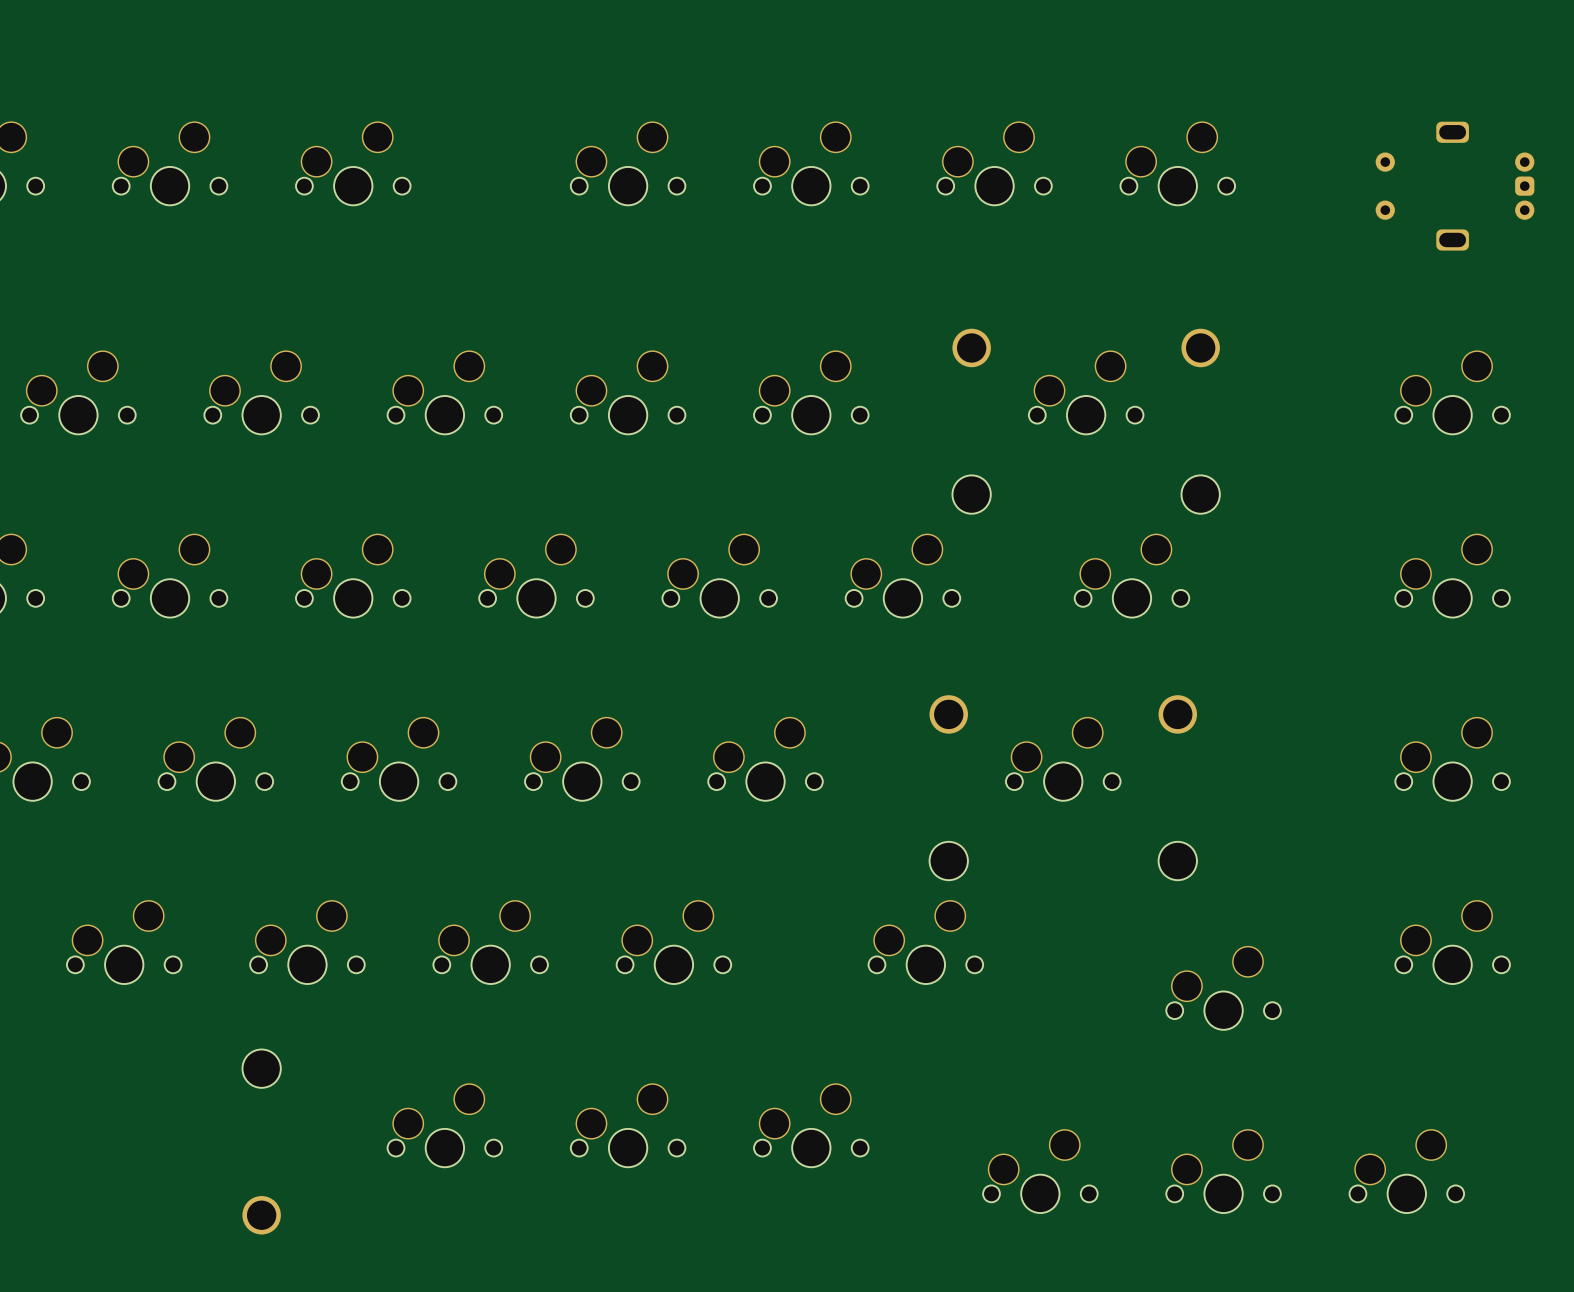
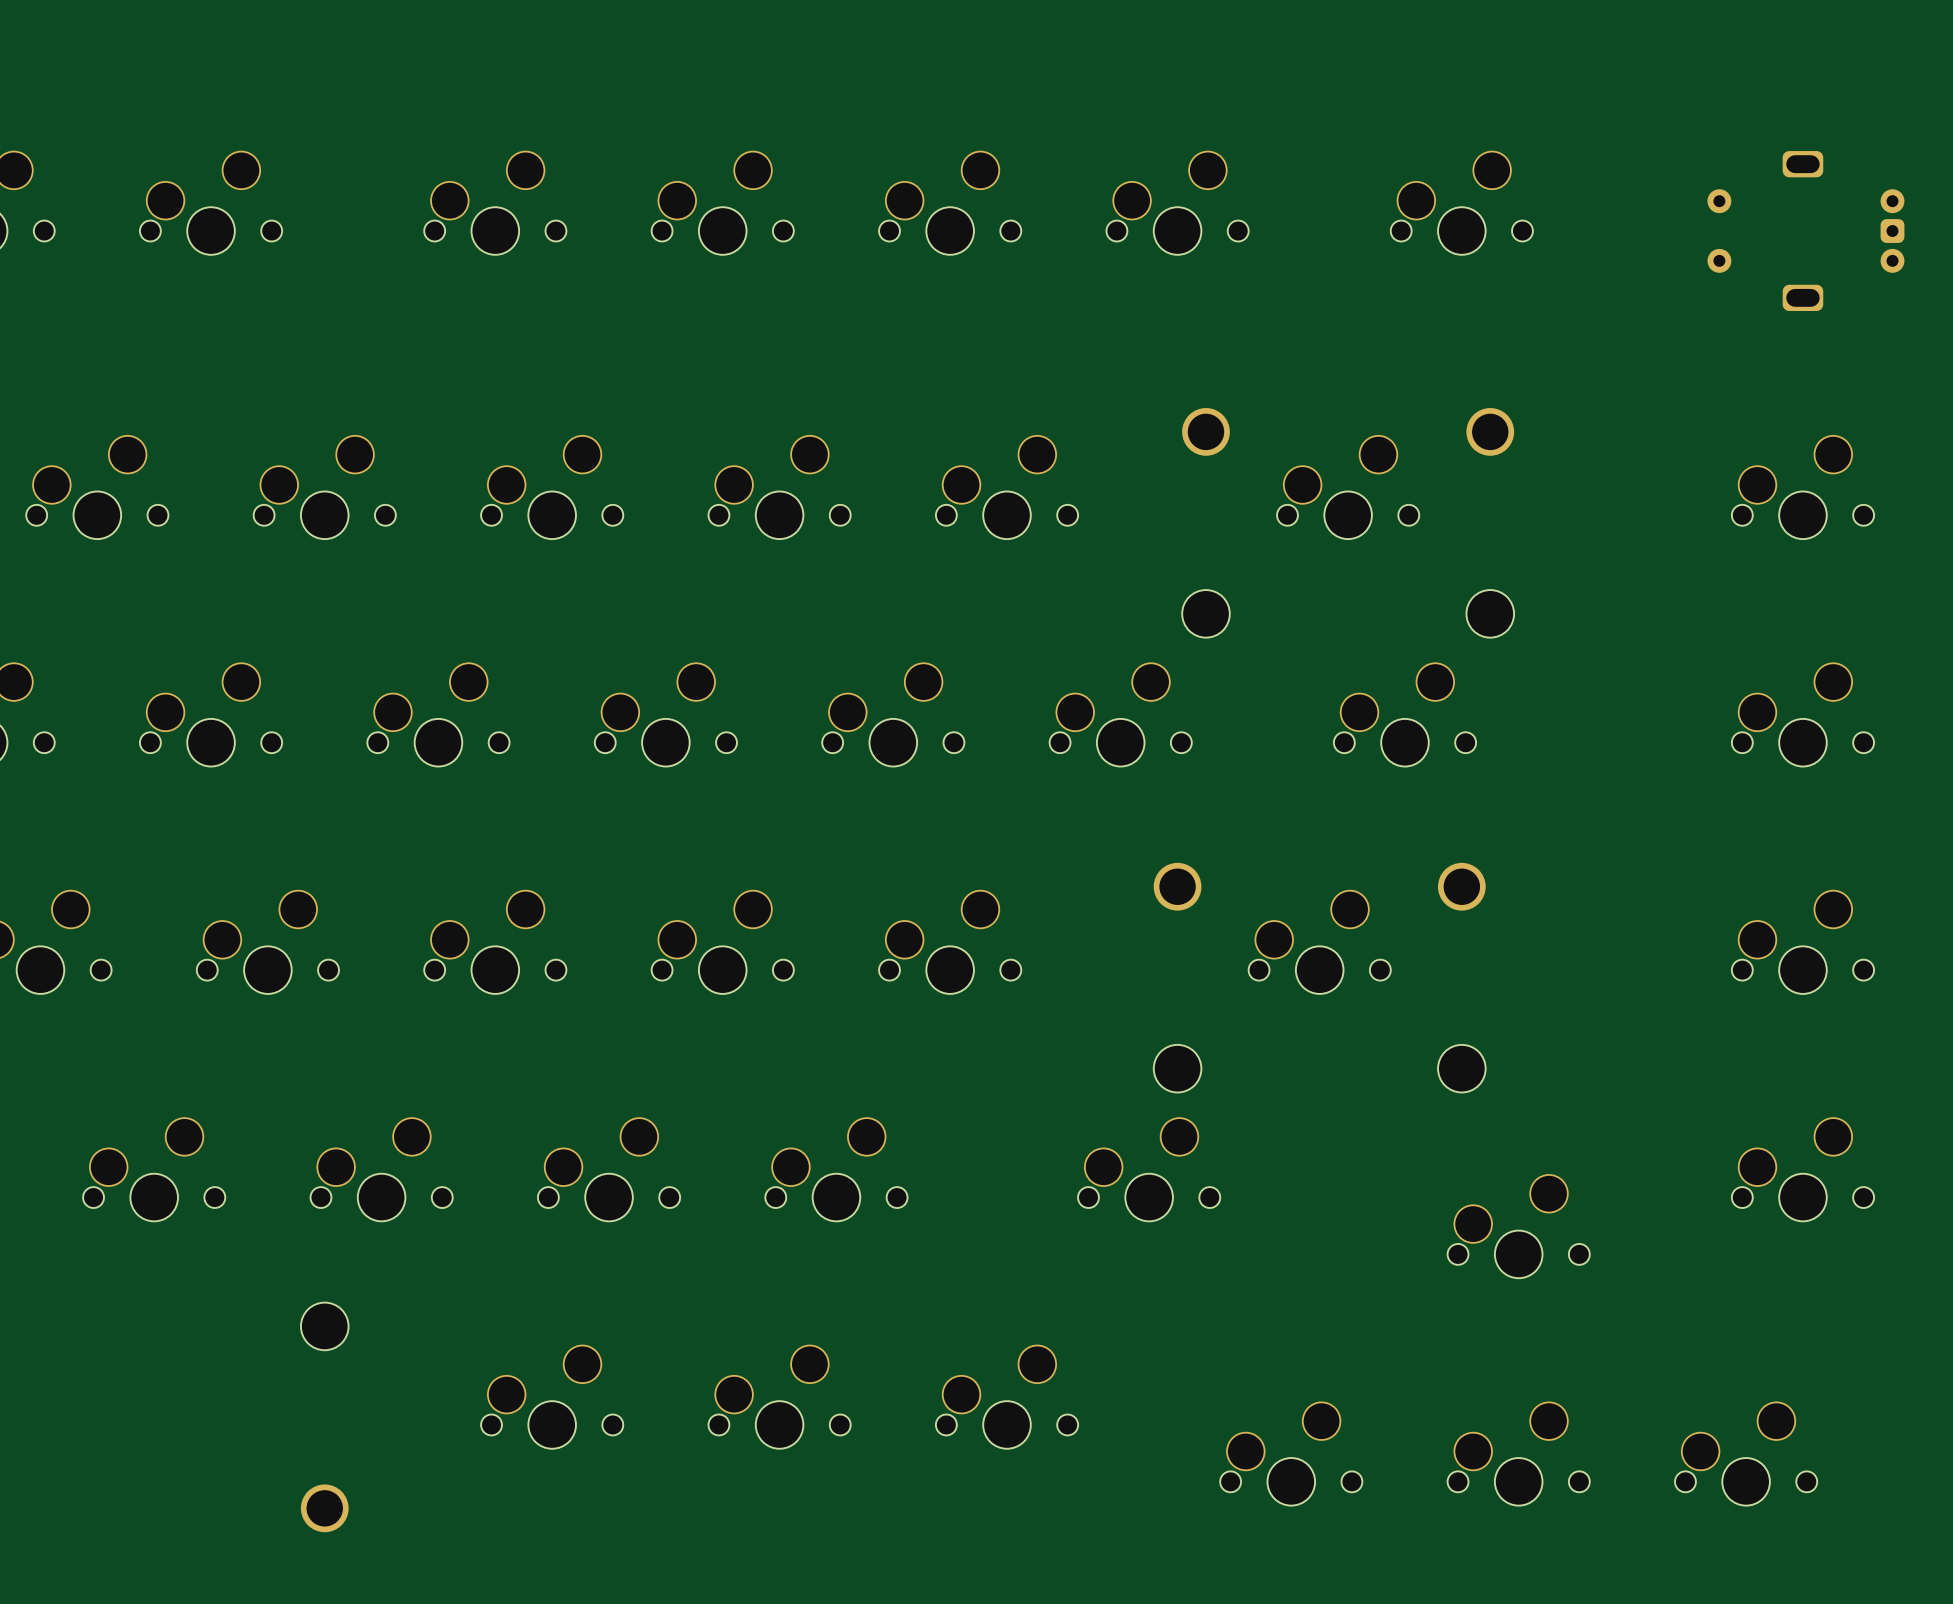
part position: (353, 163) -> (495, 202)
part position: (628, 163) -> (722, 202)
part position: (811, 163) -> (950, 202)
part position: (994, 163) -> (1177, 202)

